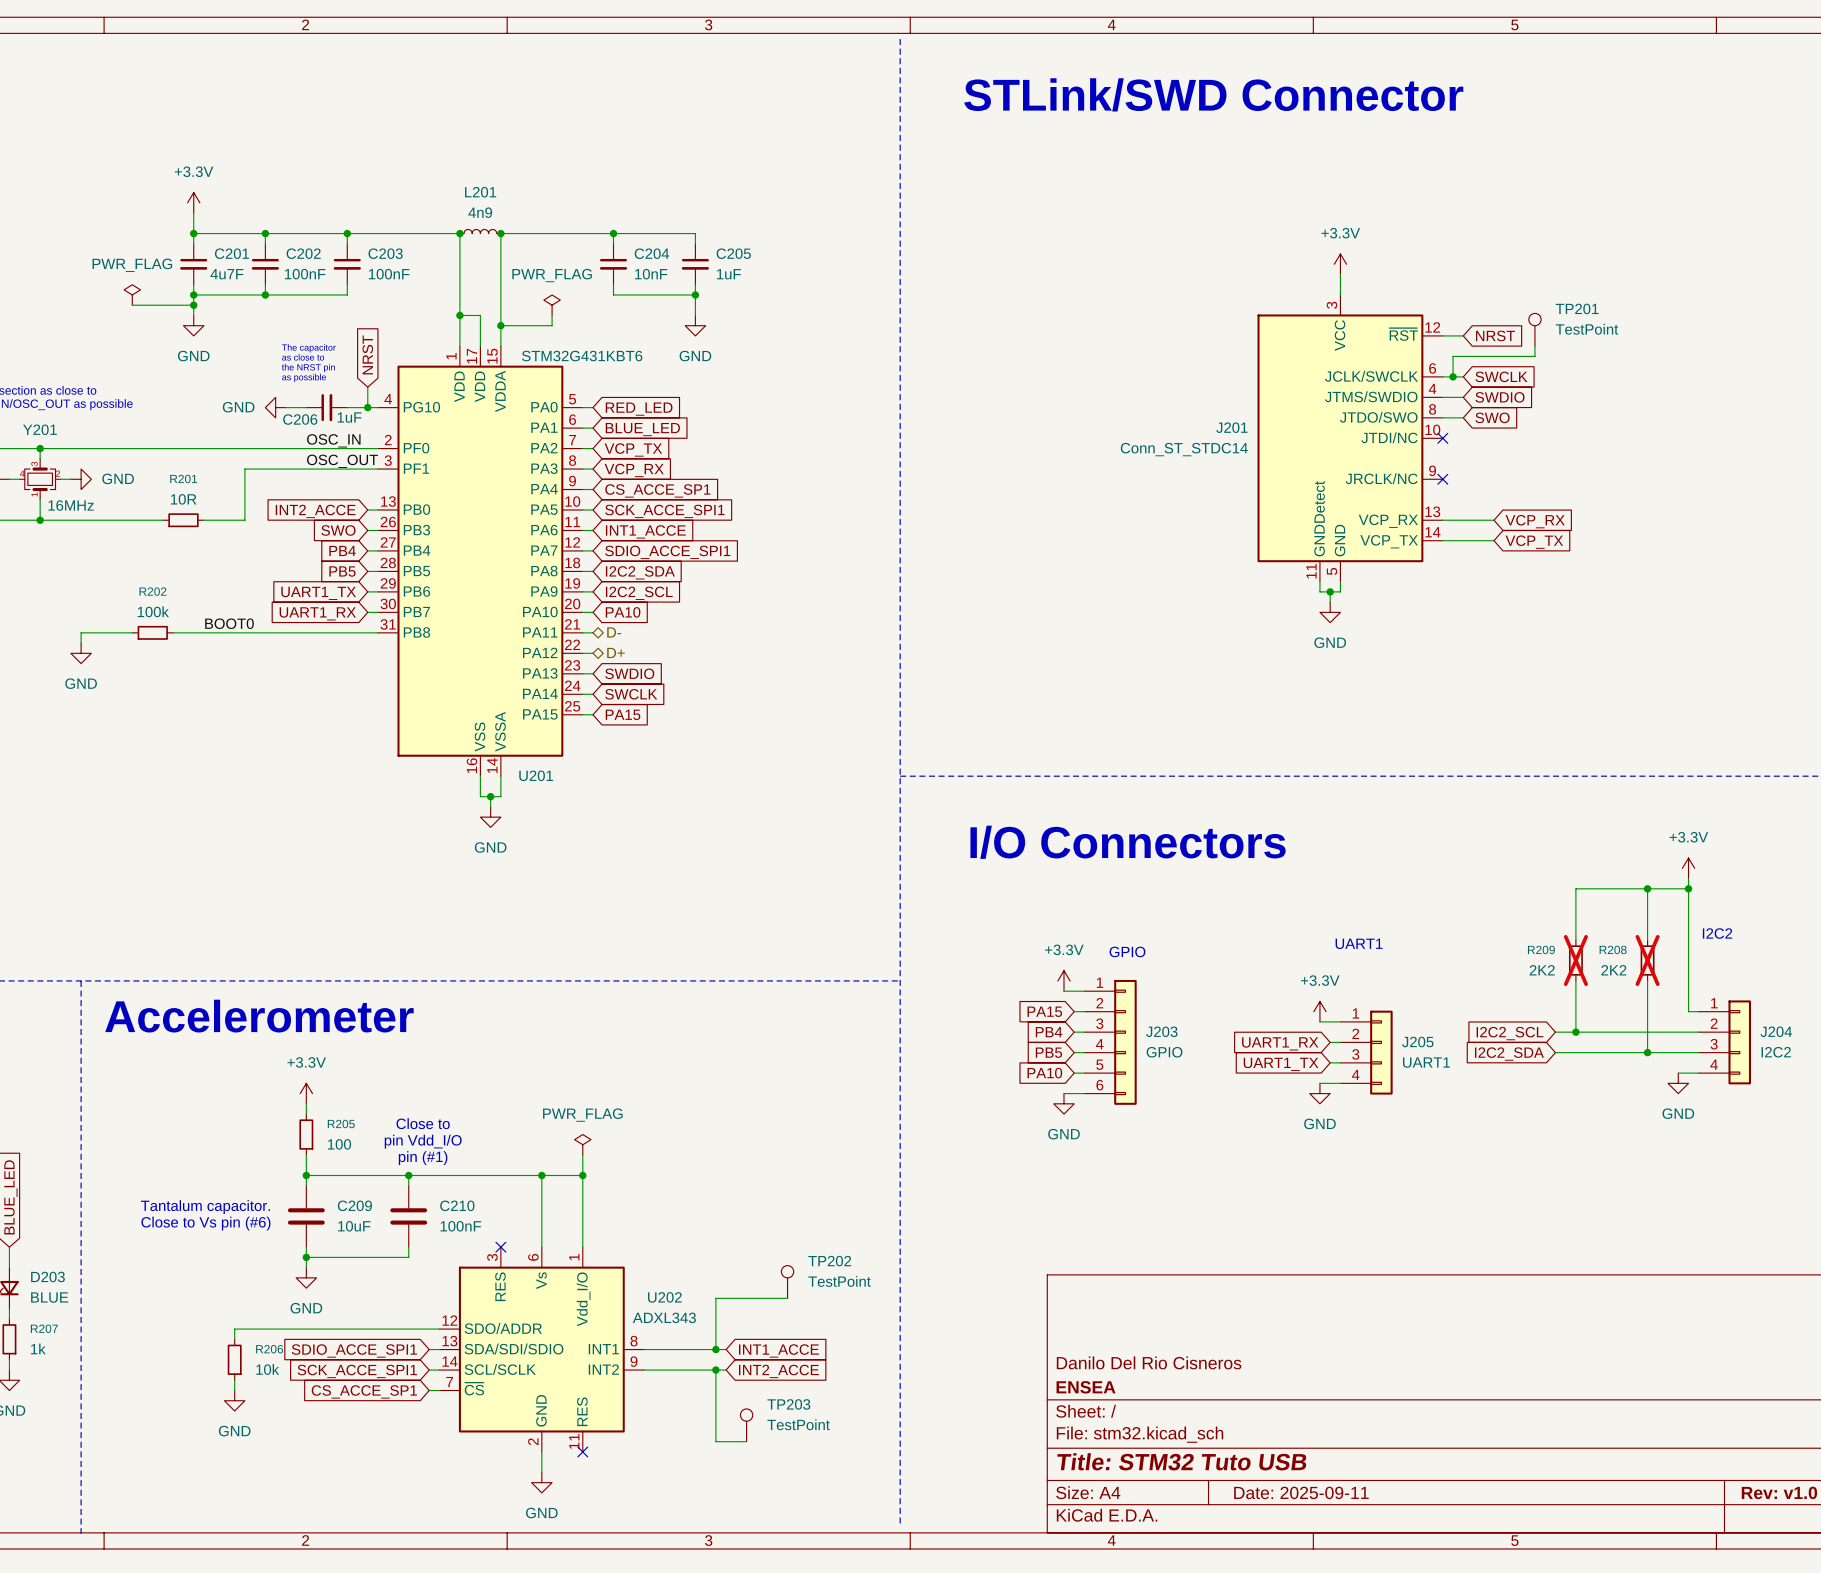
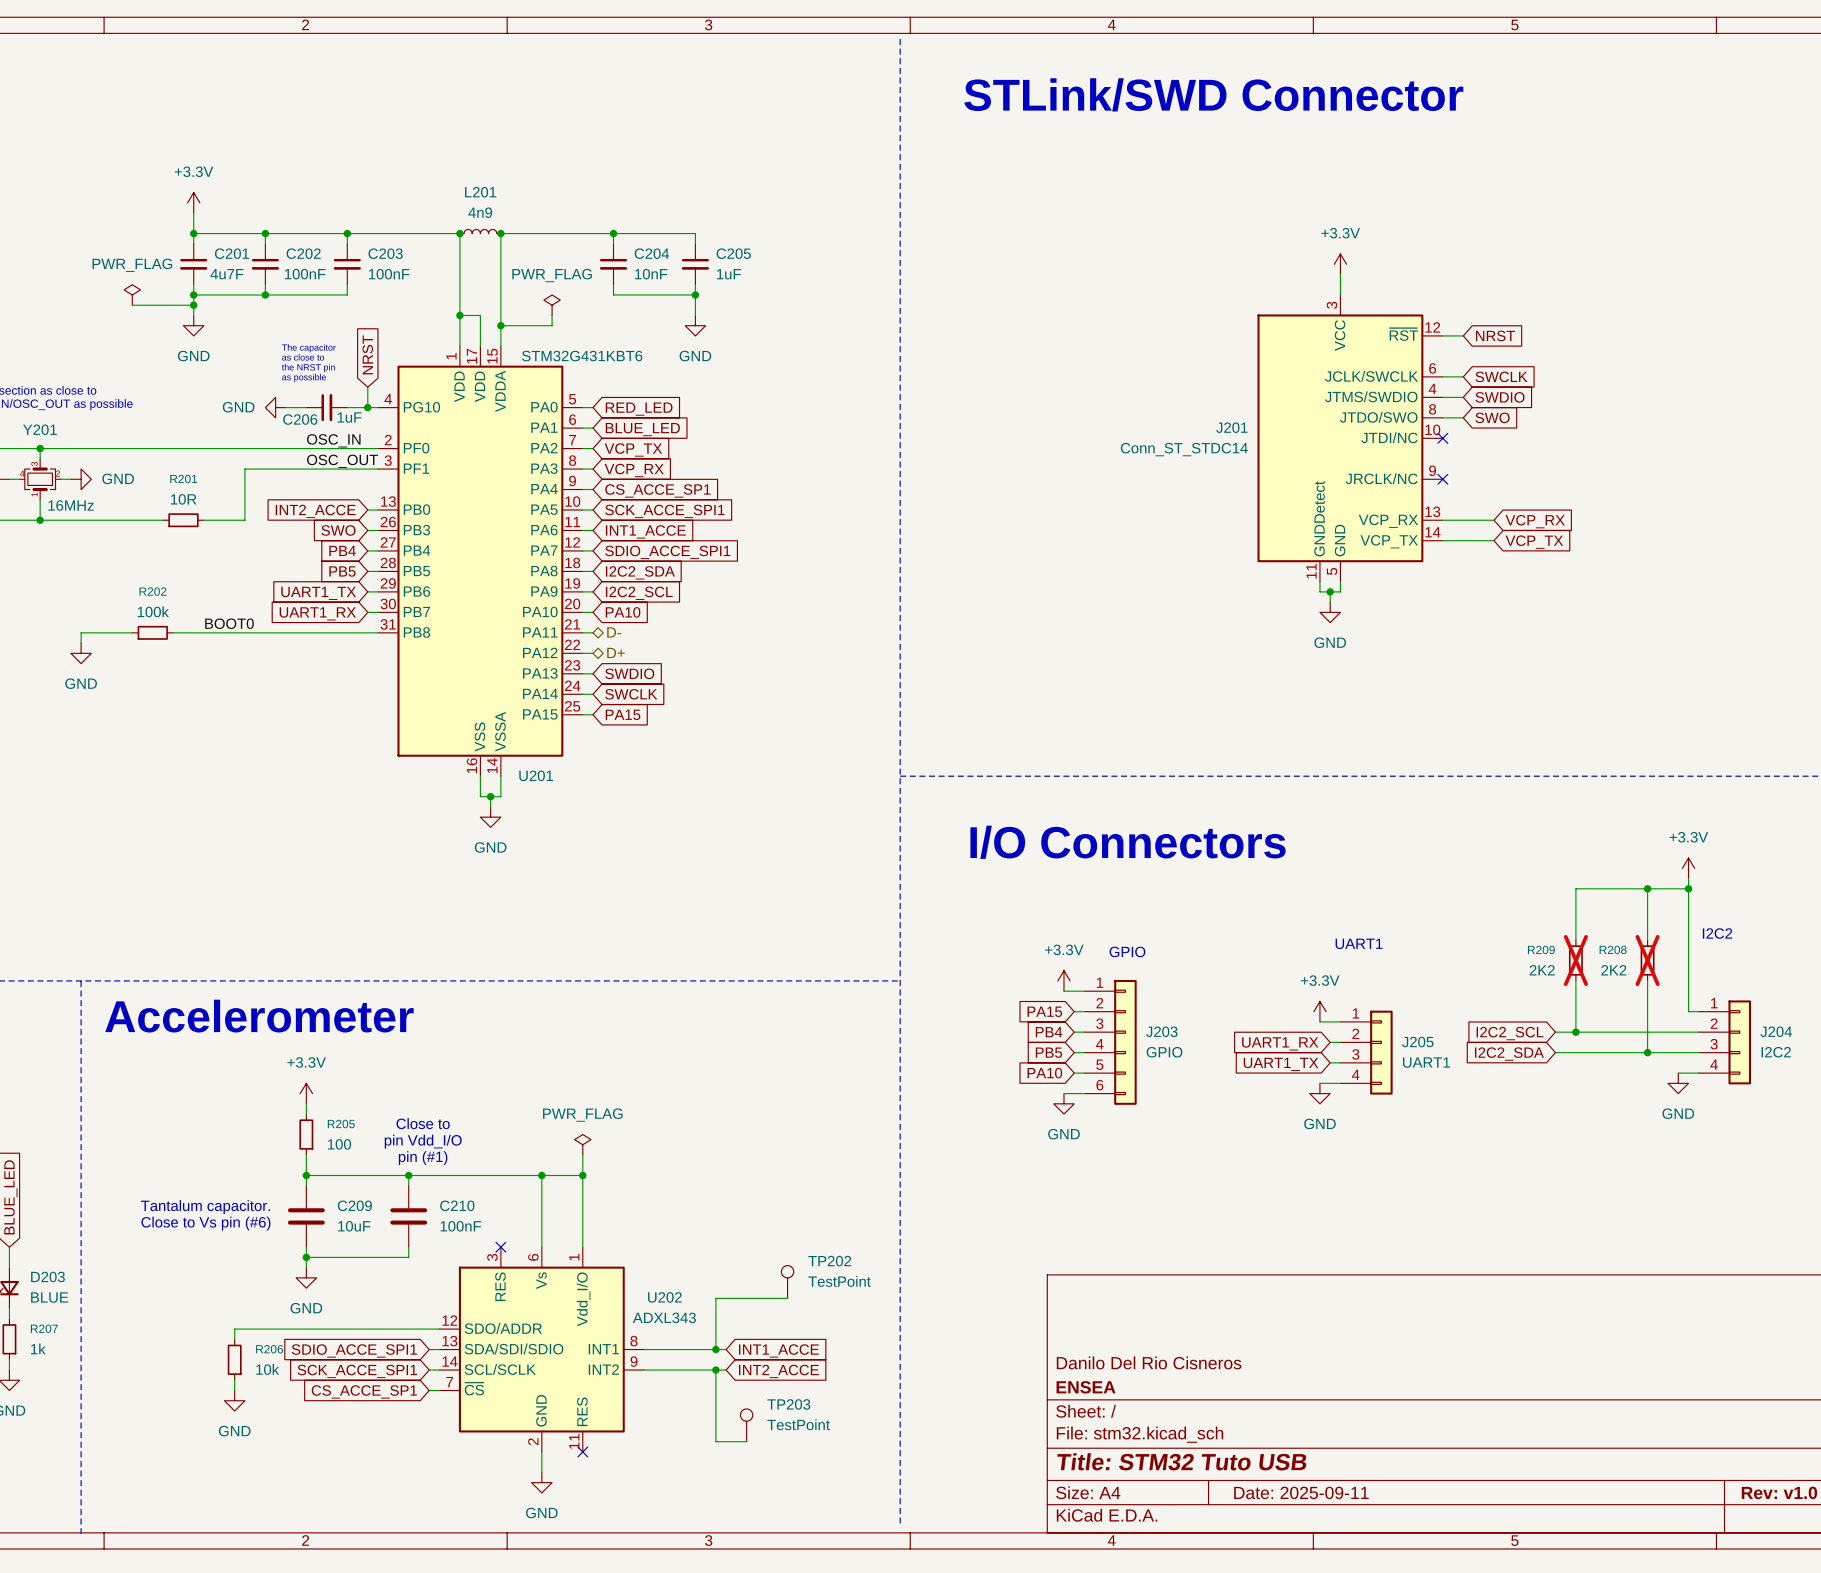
TP201: TestPoint (1534, 329) -> none
wire: (1534, 346) (1534, 356) (1453, 356) (1453, 376) -> none
junction: (1453, 376) -> none

